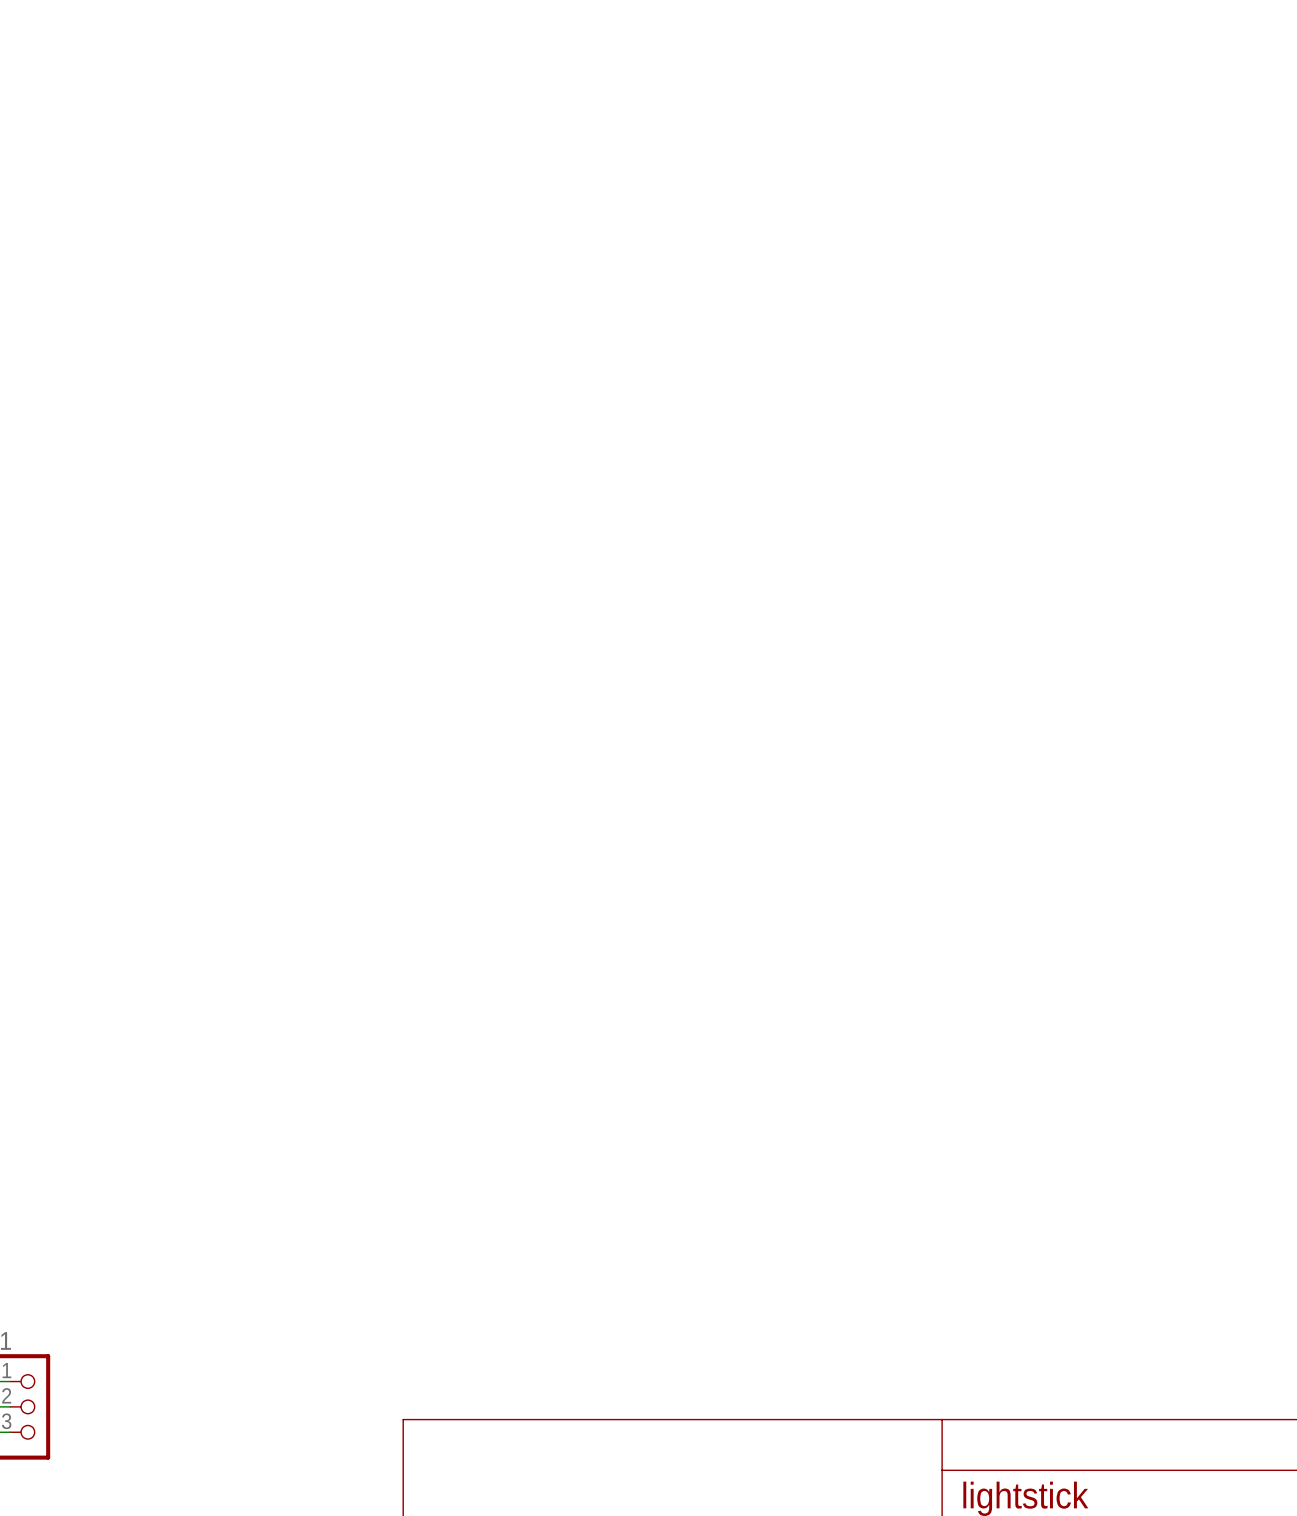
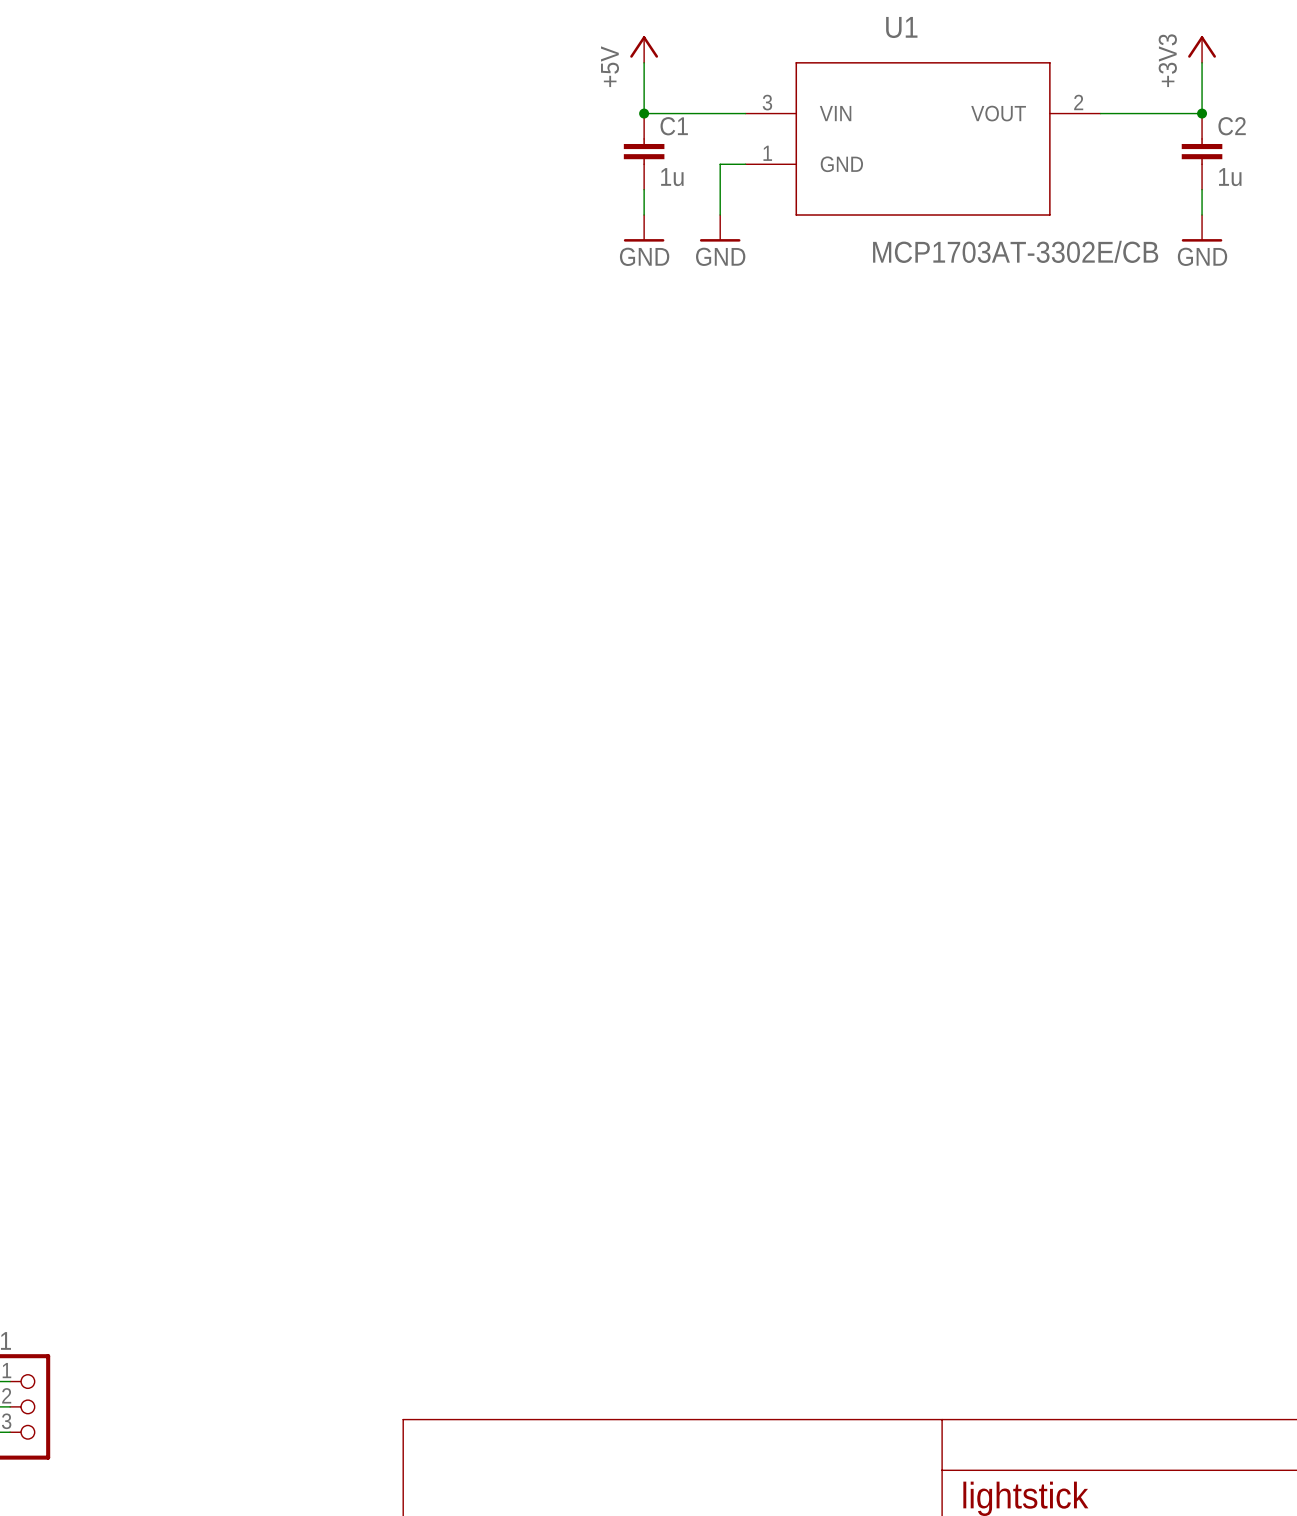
power symbol: none -> +5V (644, 49)
power symbol: none -> +3V3 (1202, 49)
wire: none -> (644, 62) (644, 113) (745, 113)
wire: none -> (1202, 62) (1202, 113) (1100, 113)
junction: none -> (644, 113)
junction: none -> (1202, 113)
U1: none -> MCP1703AT-3302E/CB (923, 138)
C1: none -> 1u (644, 151)
C2: none -> 1u (1202, 151)
wire: none -> (745, 164) (720, 164) (720, 215)
wire: none -> (644, 189) (644, 215)
wire: none -> (1202, 189) (1202, 215)
power symbol: none -> GND (644, 228)
power symbol: none -> GND (720, 228)
power symbol: none -> GND (1202, 228)

